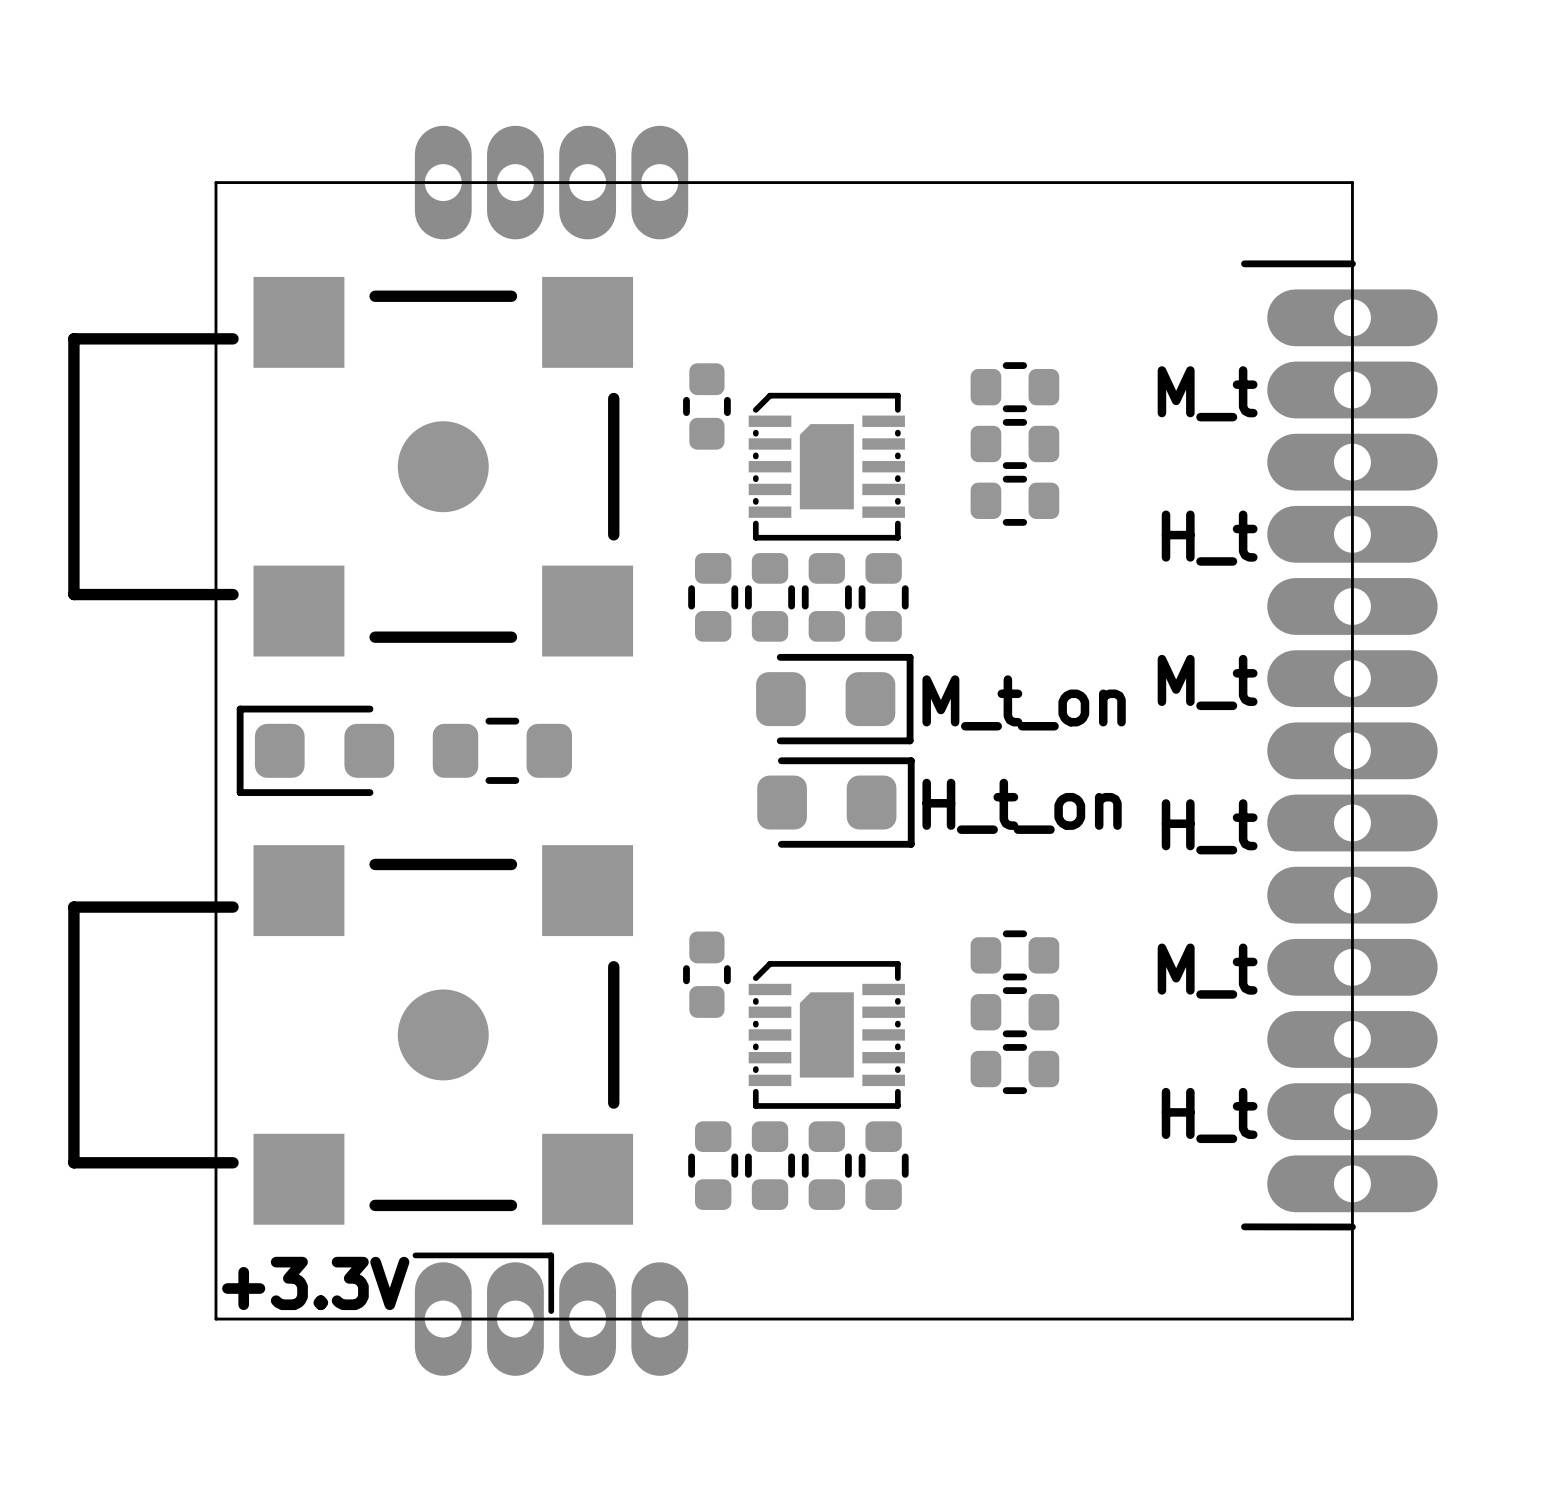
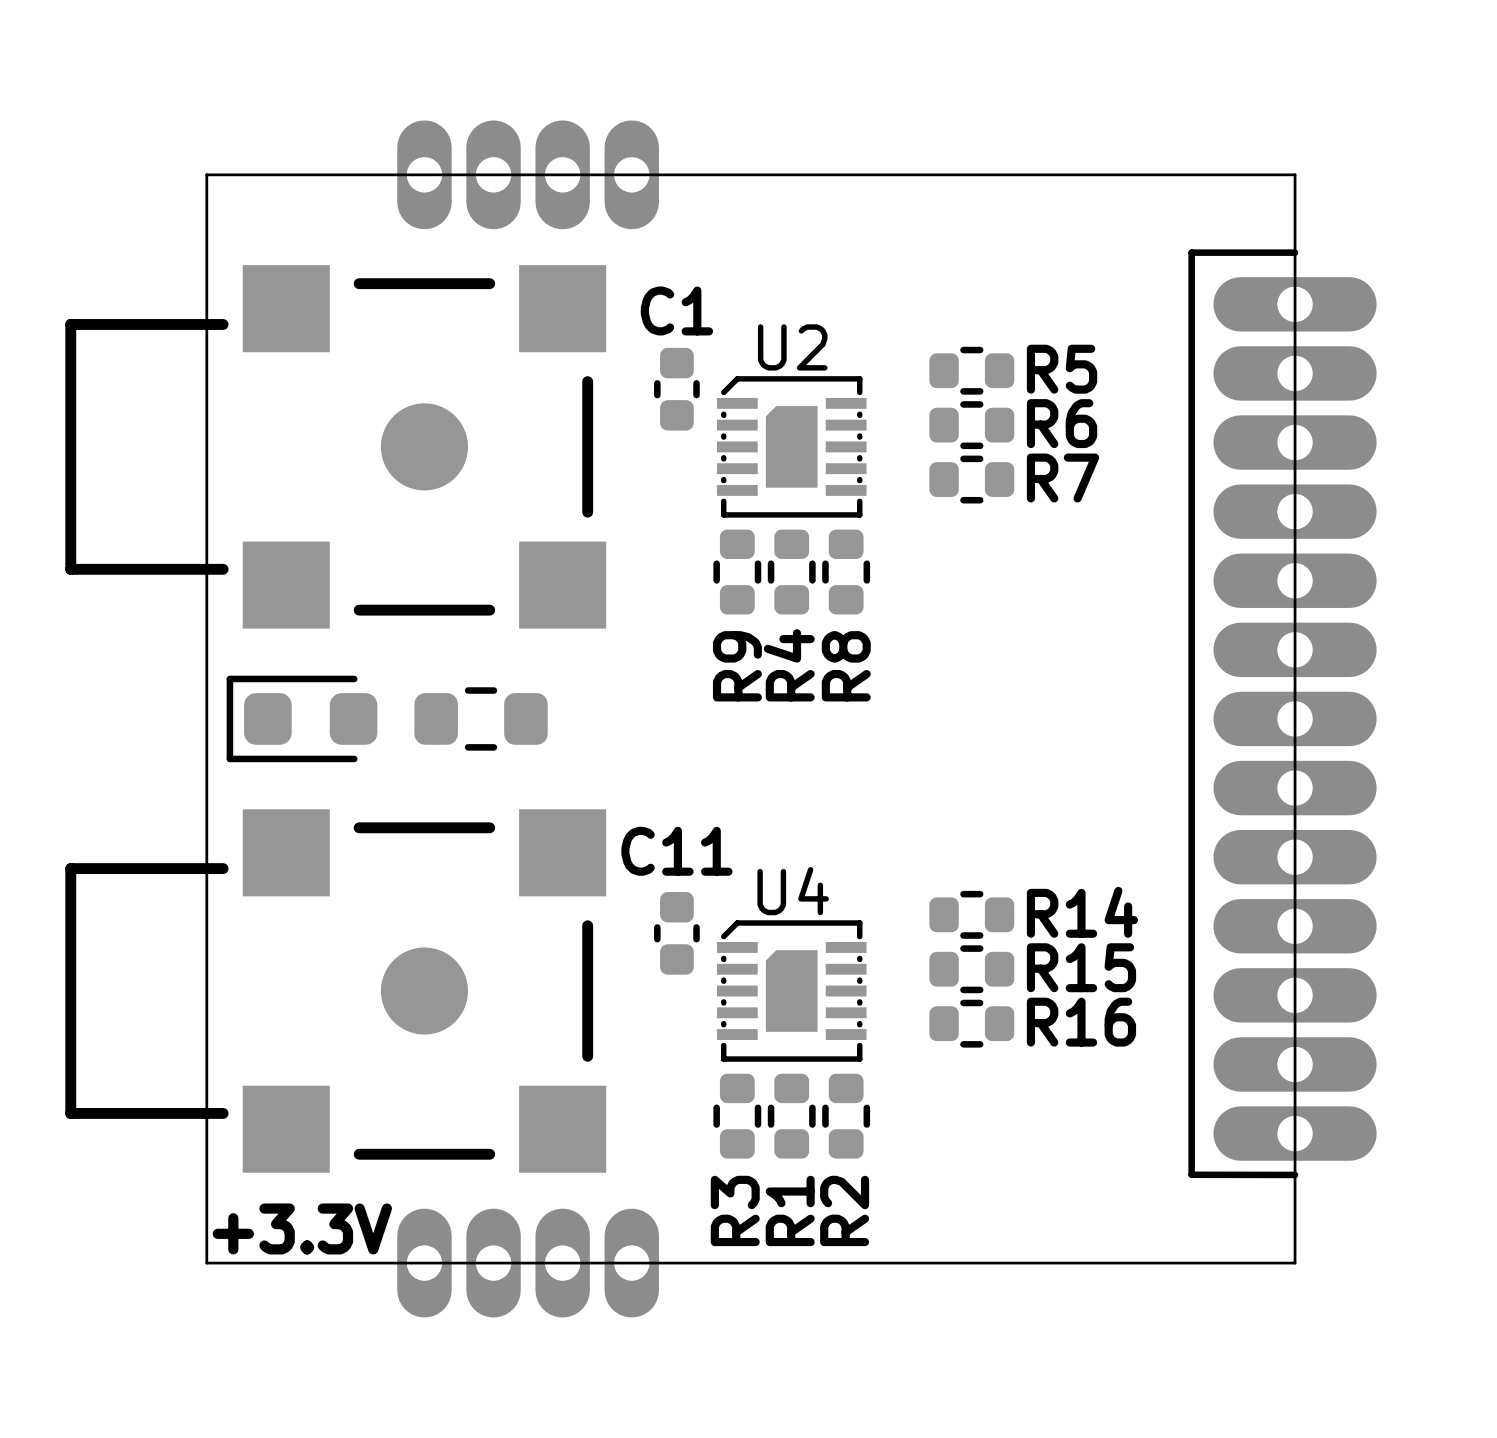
part footprint: [1241, 260, 1438, 1231] -> [1188, 249, 1377, 1179]
C1 name: none -> C1 (676, 310)
U2 name: none -> U2 (792, 347)
R5 name: none -> R5 (1062, 369)
text: M_t (1207, 393) -> none
R6 name: none -> R6 (1062, 423)
R7 name: none -> R7 (1063, 478)
text: H_t (1209, 538) -> none
part: (713, 597) -> none
text: M_t (1207, 682) -> none
R4 name: none -> R4 (789, 665)
R9 name: none -> R9 (737, 666)
R8 name: none -> R8 (846, 666)
part: (834, 699) -> none
text: M_t_on (1024, 702) -> none
part: (835, 802) -> none
text: H_t_on (1022, 806) -> none
text: H_t (1209, 826) -> none
C11 name: none -> C11 (676, 851)
U4 name: none -> U4 (793, 891)
R14 name: none -> R14 (1082, 912)
text: M_t (1207, 971) -> none
R15 name: none -> R15 (1081, 967)
R16 name: none -> R16 (1081, 1022)
text: H_t (1209, 1115) -> none
part: (713, 1165) -> none
line: (415, 1255) (551, 1255) (551, 1311) -> none
R3 name: none -> R3 (735, 1210)
R1 name: none -> R1 (790, 1210)
R2 name: none -> R2 (844, 1210)

